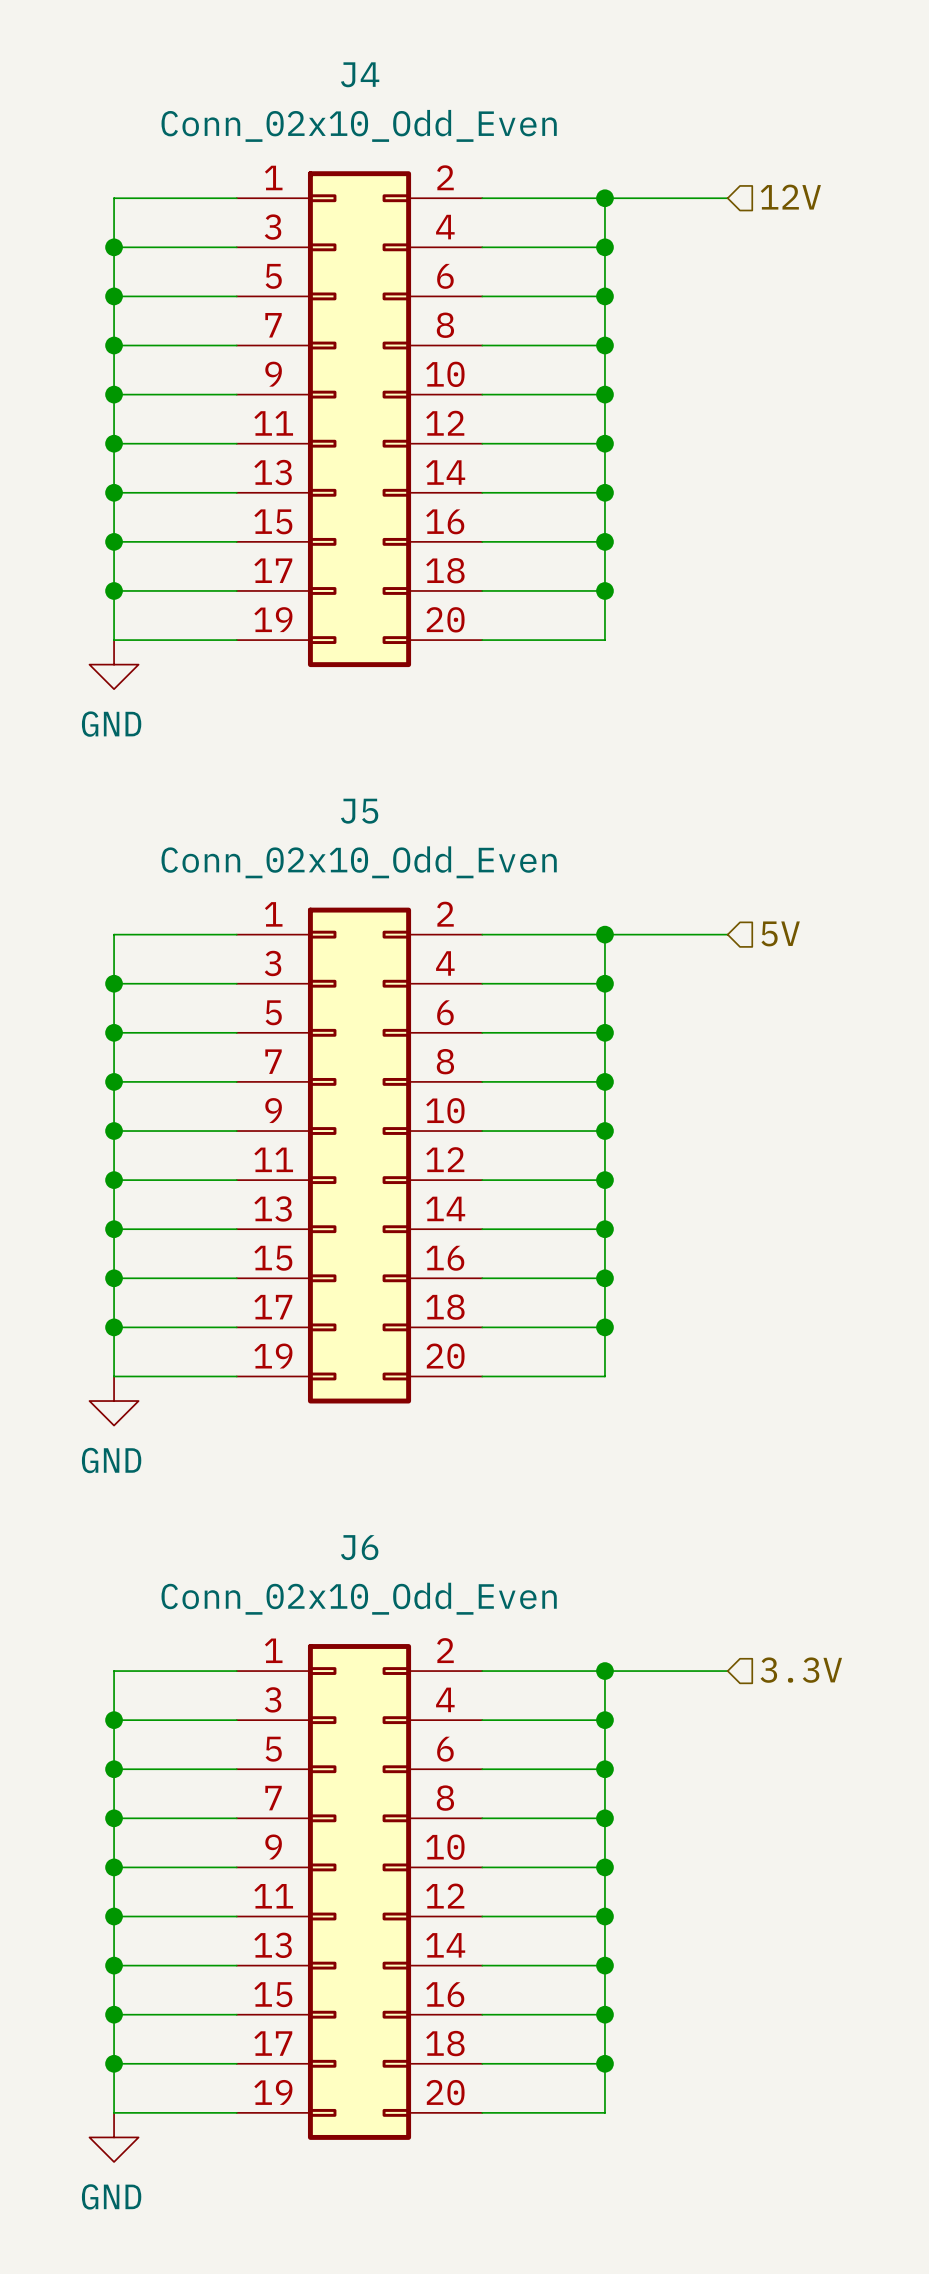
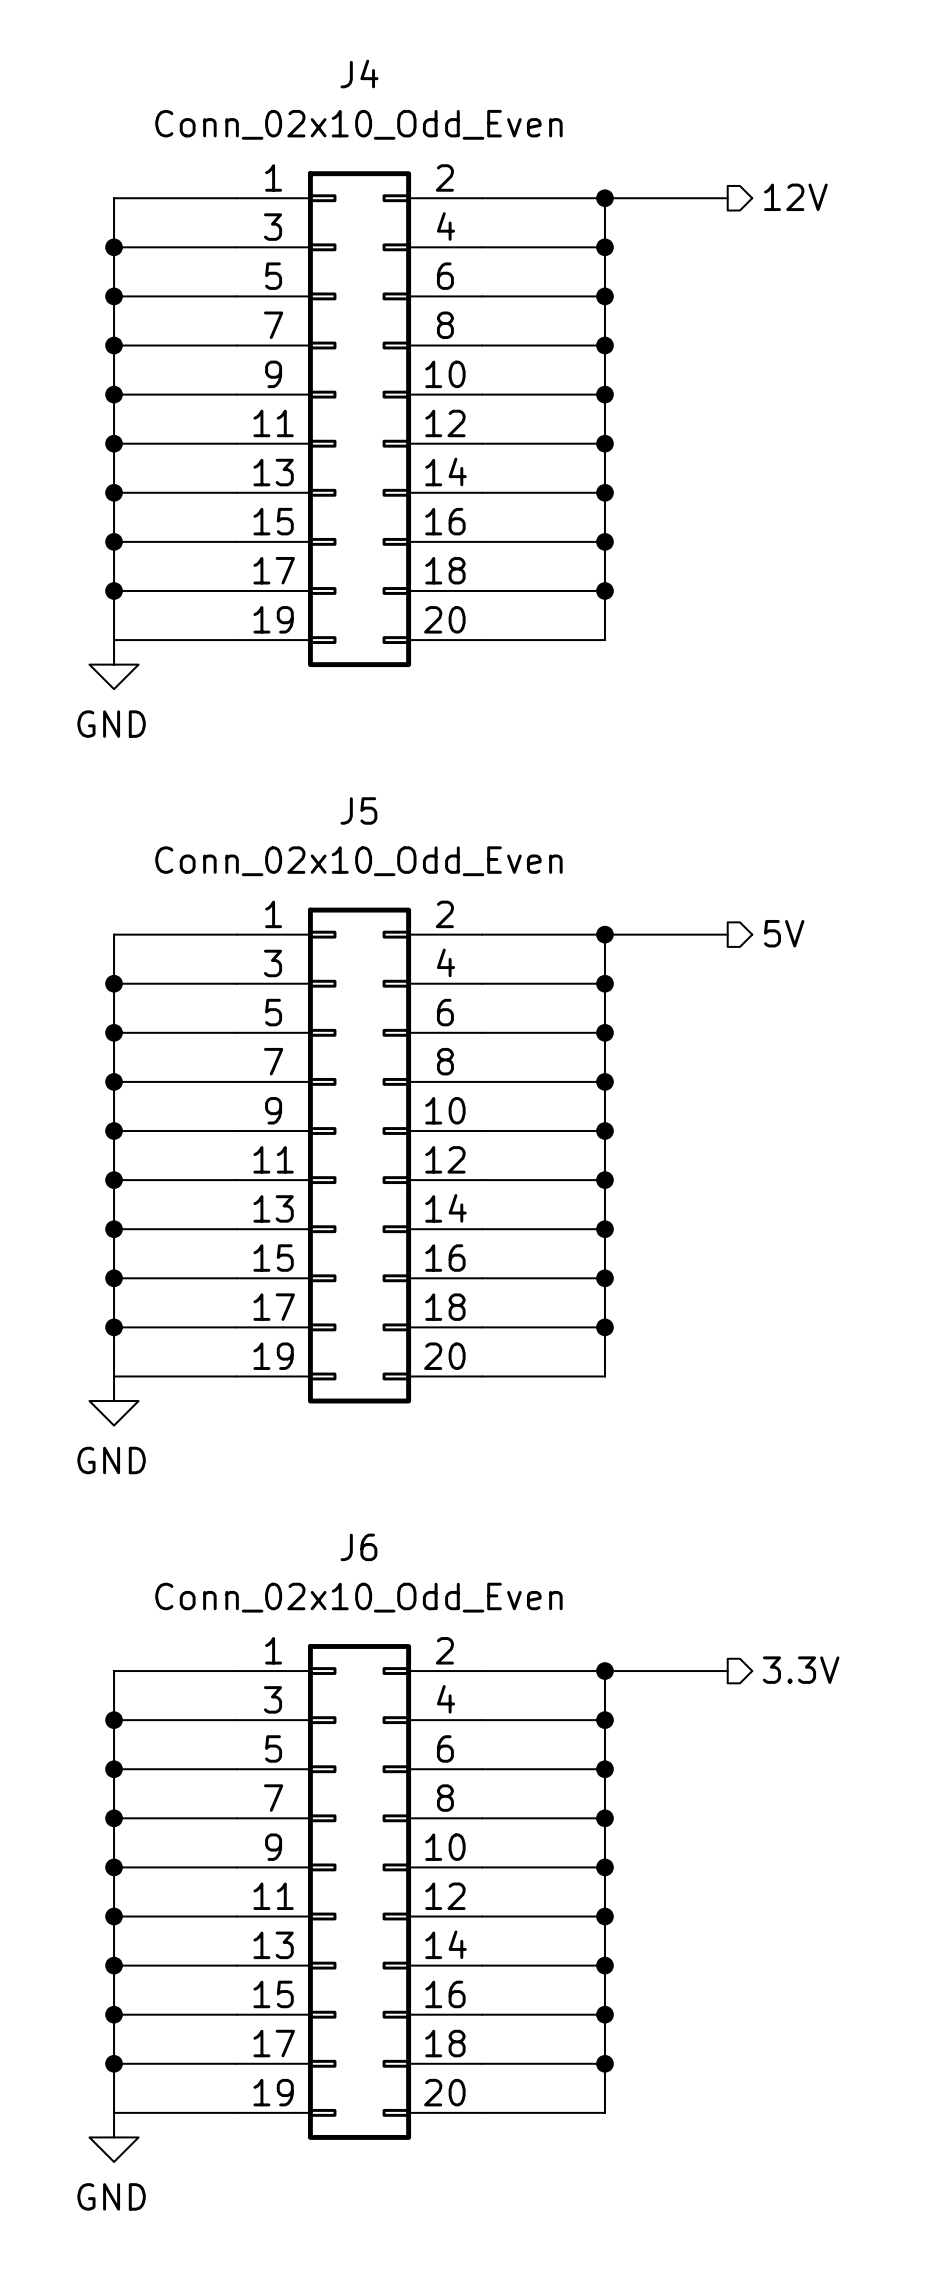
hierarchical label shape: input (790, 197) -> output (795, 197)
hierarchical label shape: input (780, 933) -> output (784, 933)
hierarchical label shape: input (801, 1670) -> output (801, 1670)

